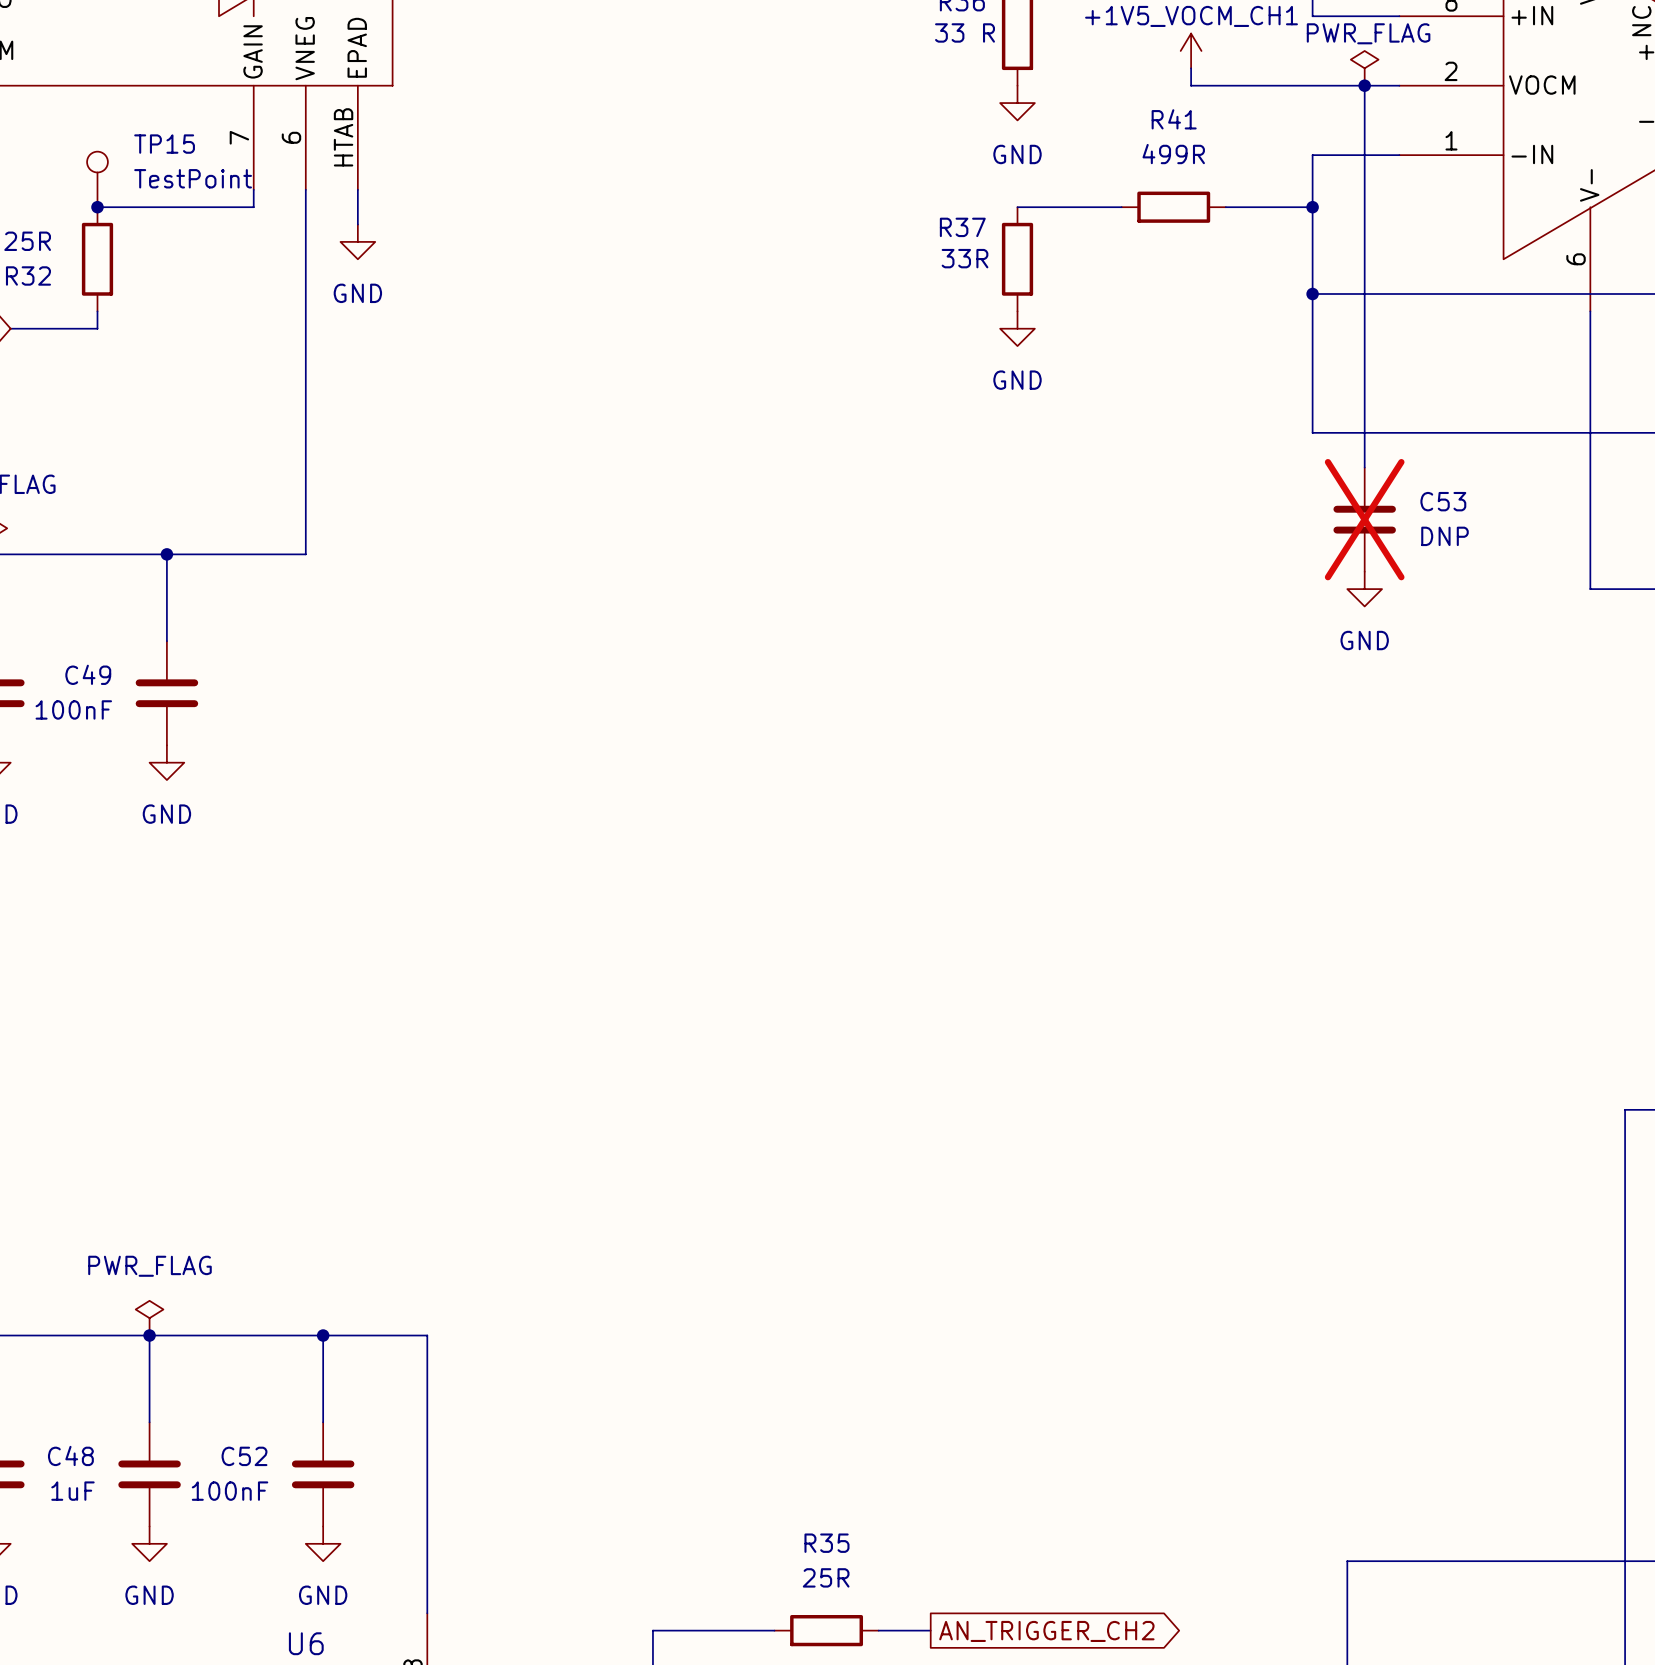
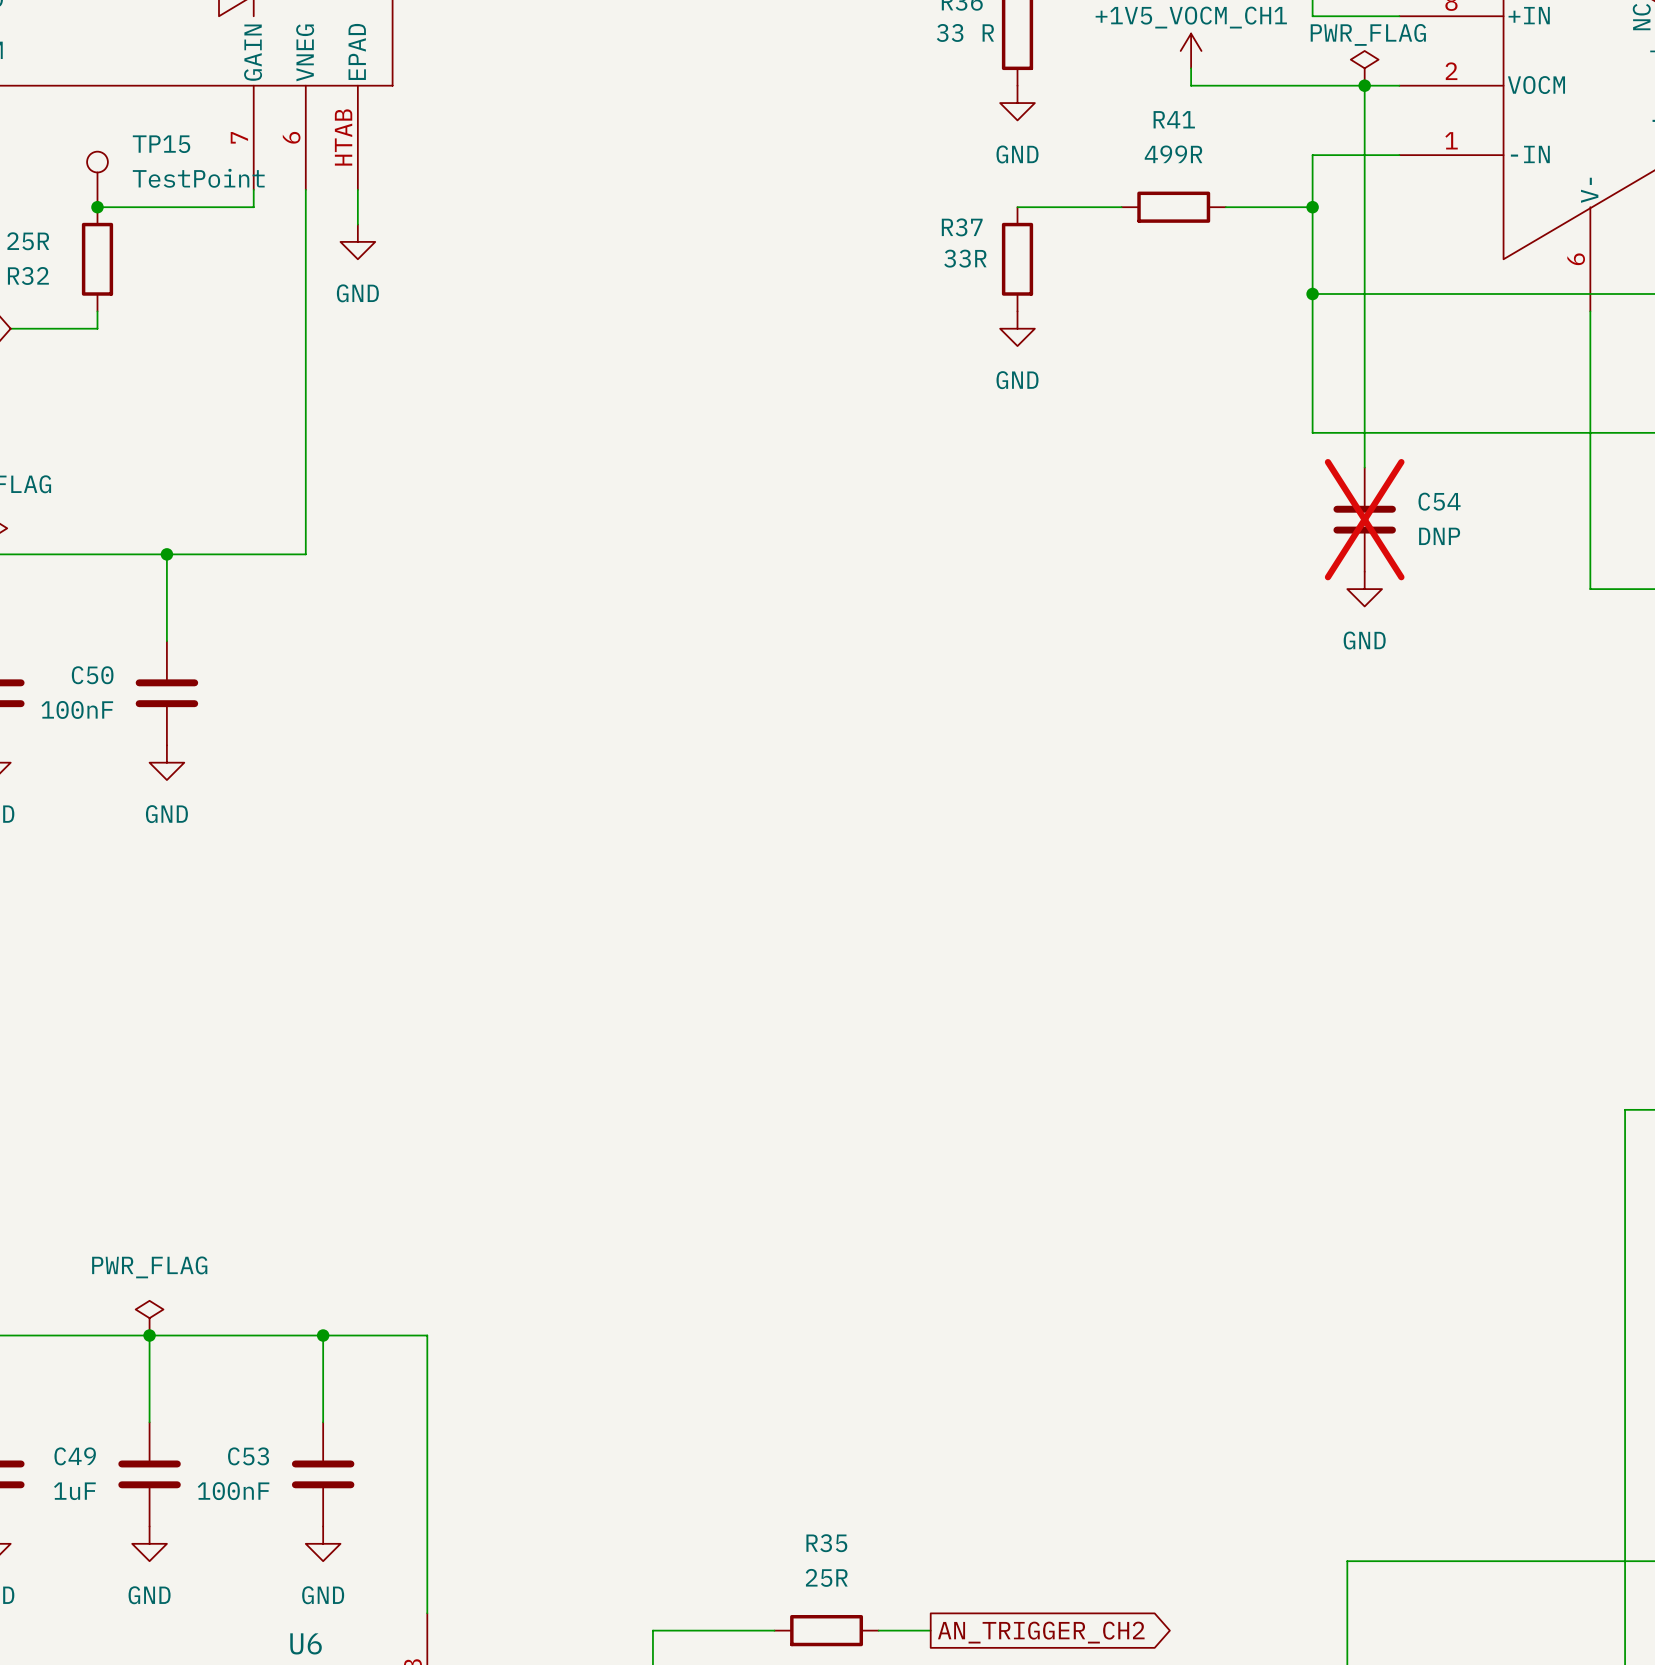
C53 name: C53 (1443, 501) -> C54 (1439, 501)
C49 name: C49 (88, 674) -> C50 (92, 675)
C48 name: C48 (70, 1455) -> C49 (75, 1456)
C52 name: C52 (244, 1456) -> C53 (248, 1456)

